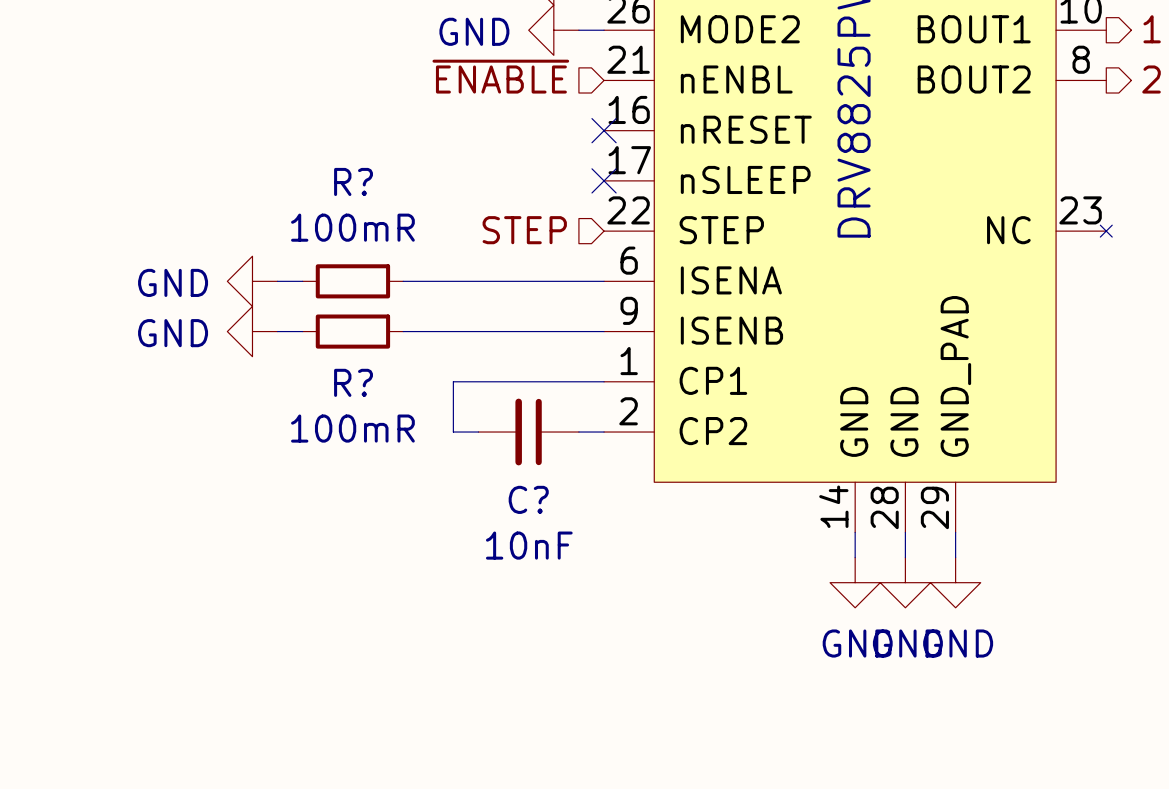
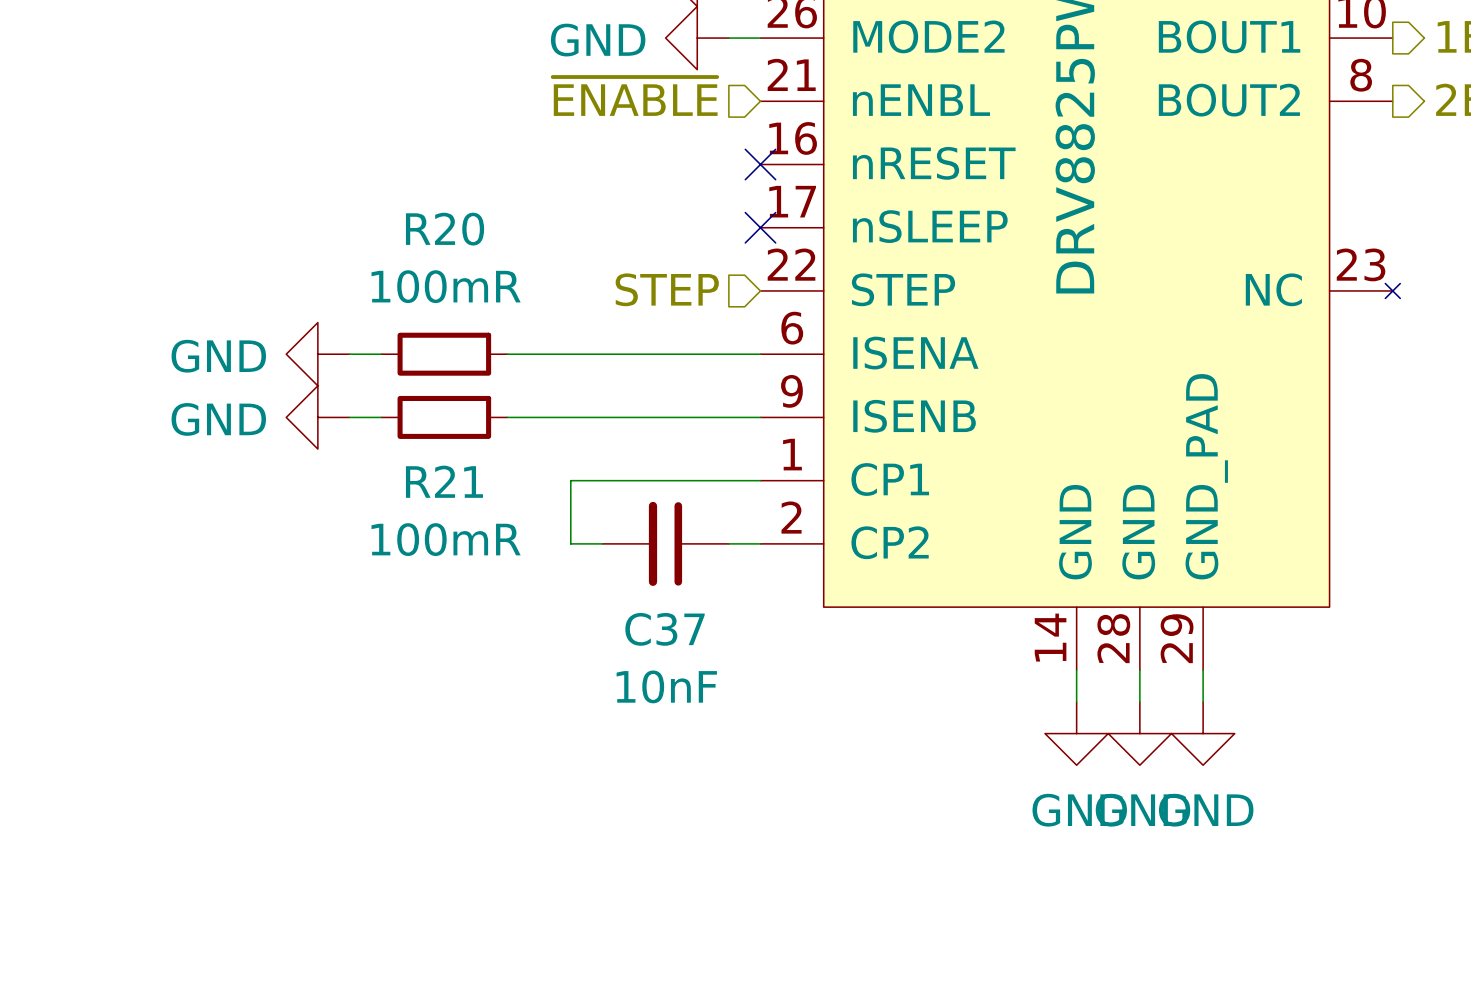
R? name: R? (353, 181) -> R20 (445, 229)
R? name: R? (353, 382) -> R21 (444, 481)
C? name: C? (528, 499) -> C37 (665, 629)

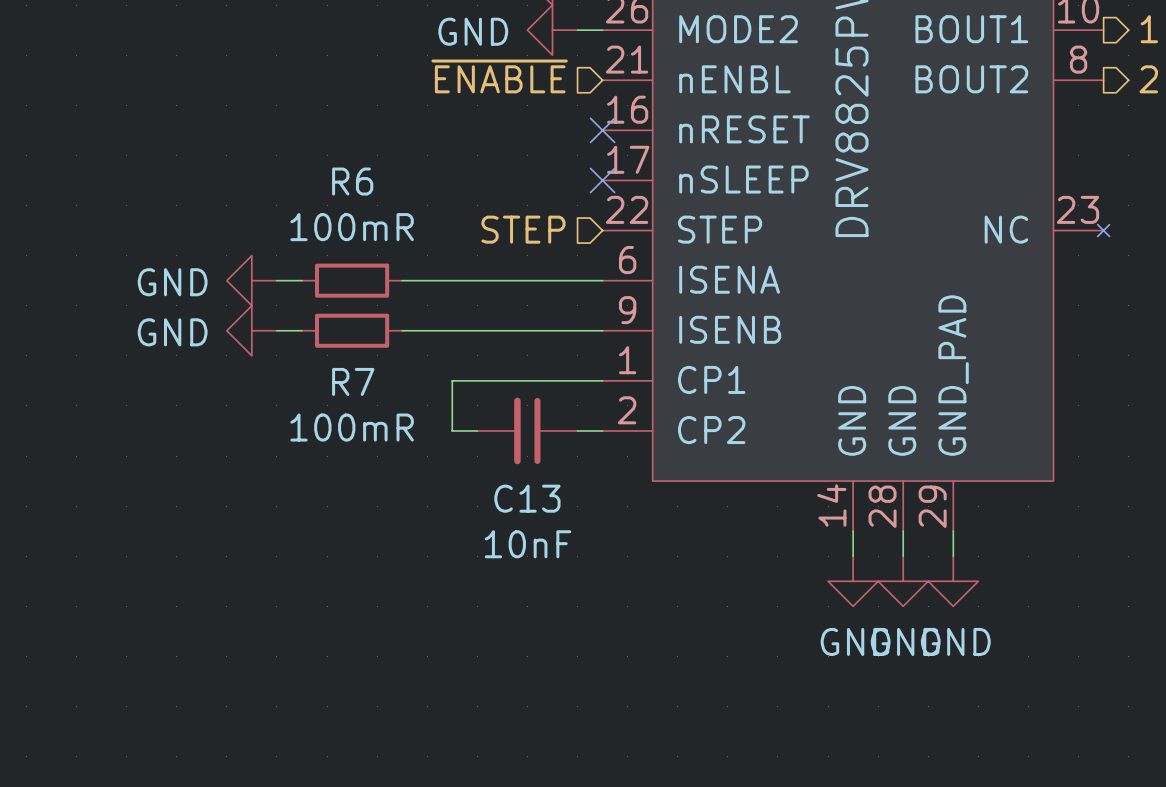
R20 name: R20 (445, 229) -> R6 (352, 181)
R21 name: R21 (444, 481) -> R7 (353, 381)
C37 name: C37 (665, 629) -> C13 (527, 498)

